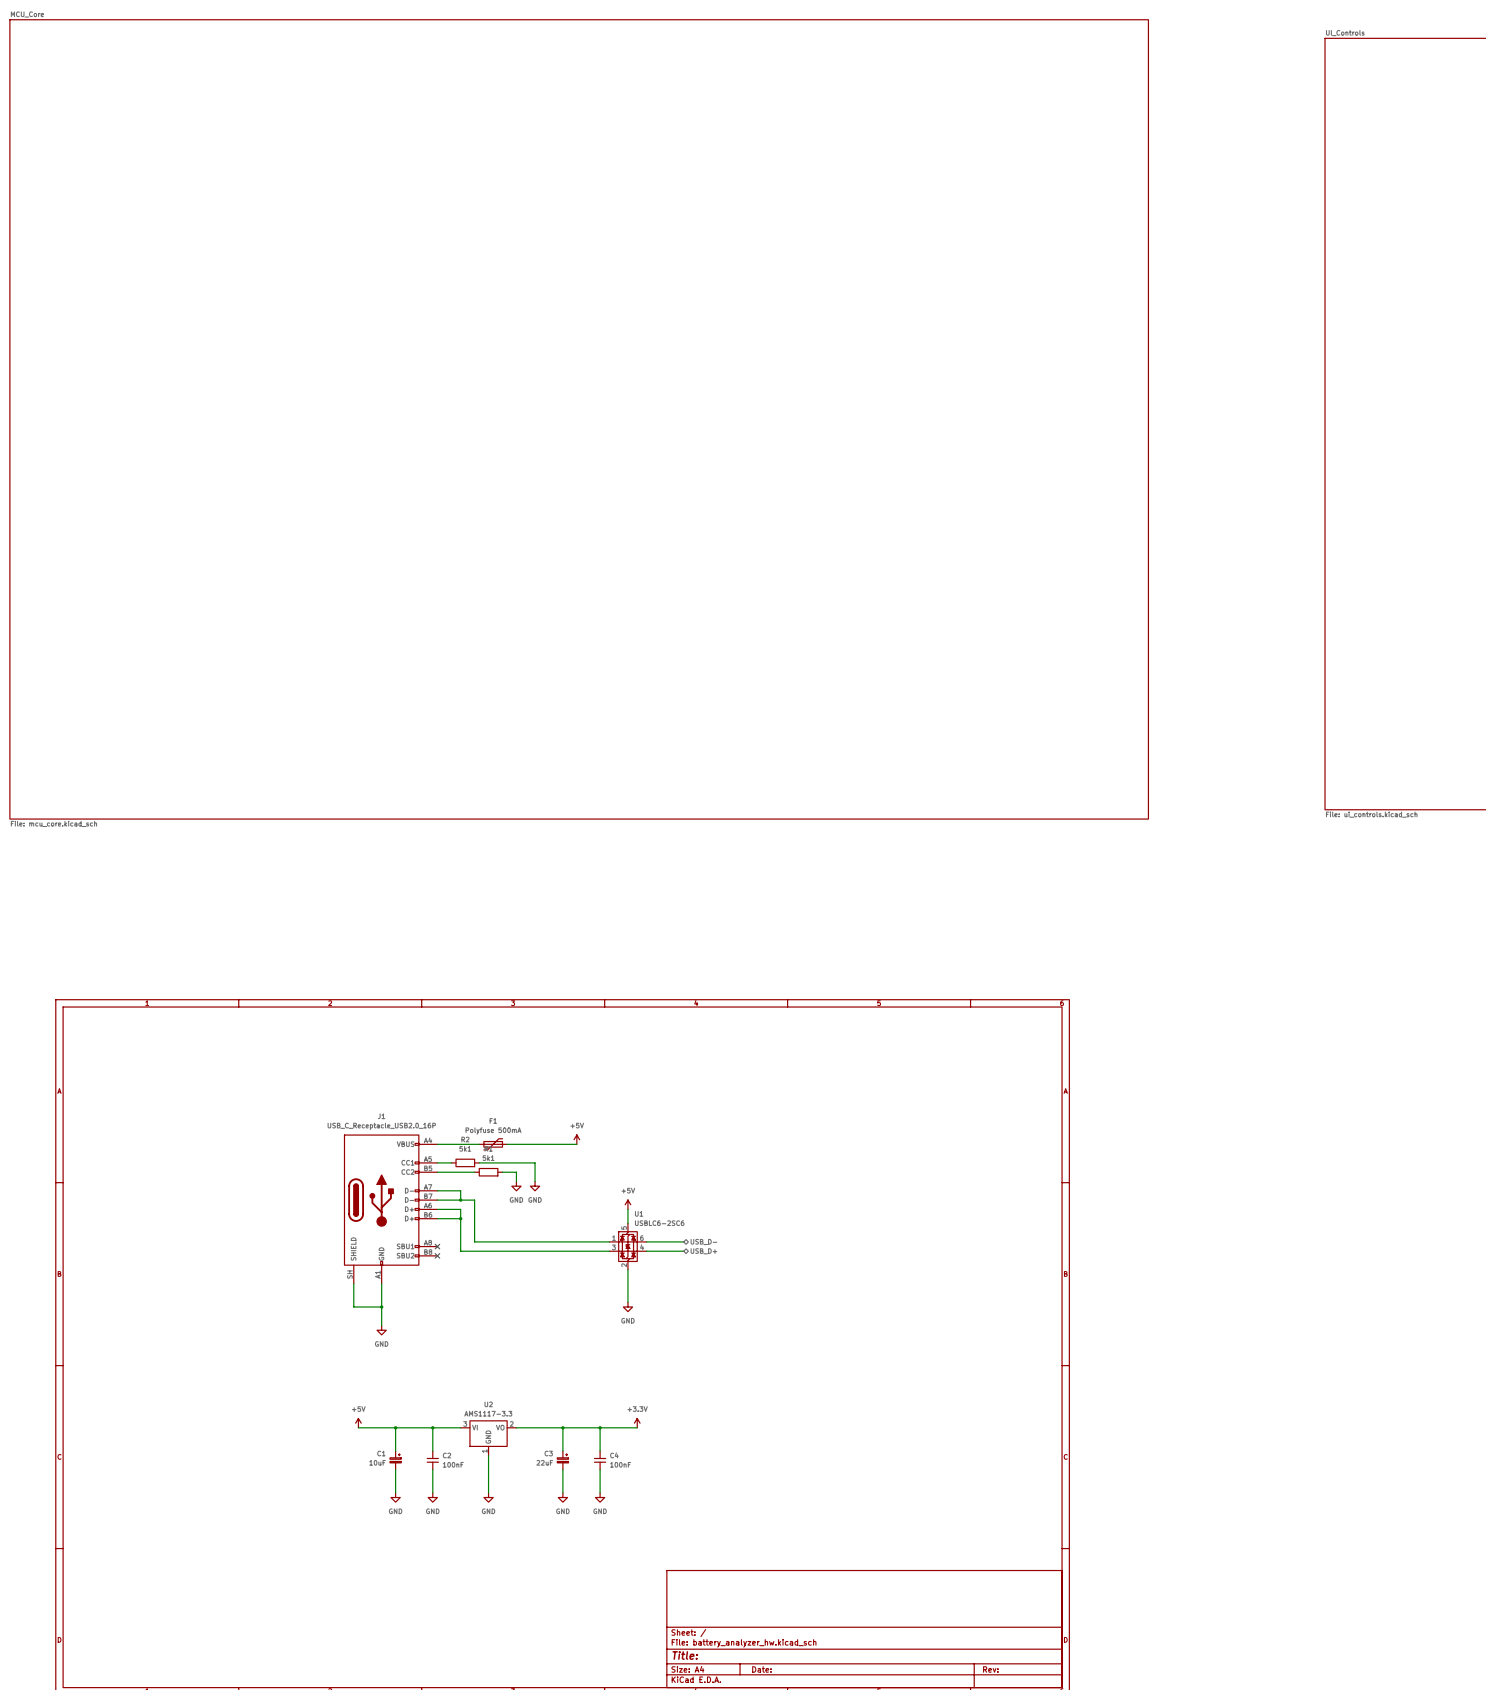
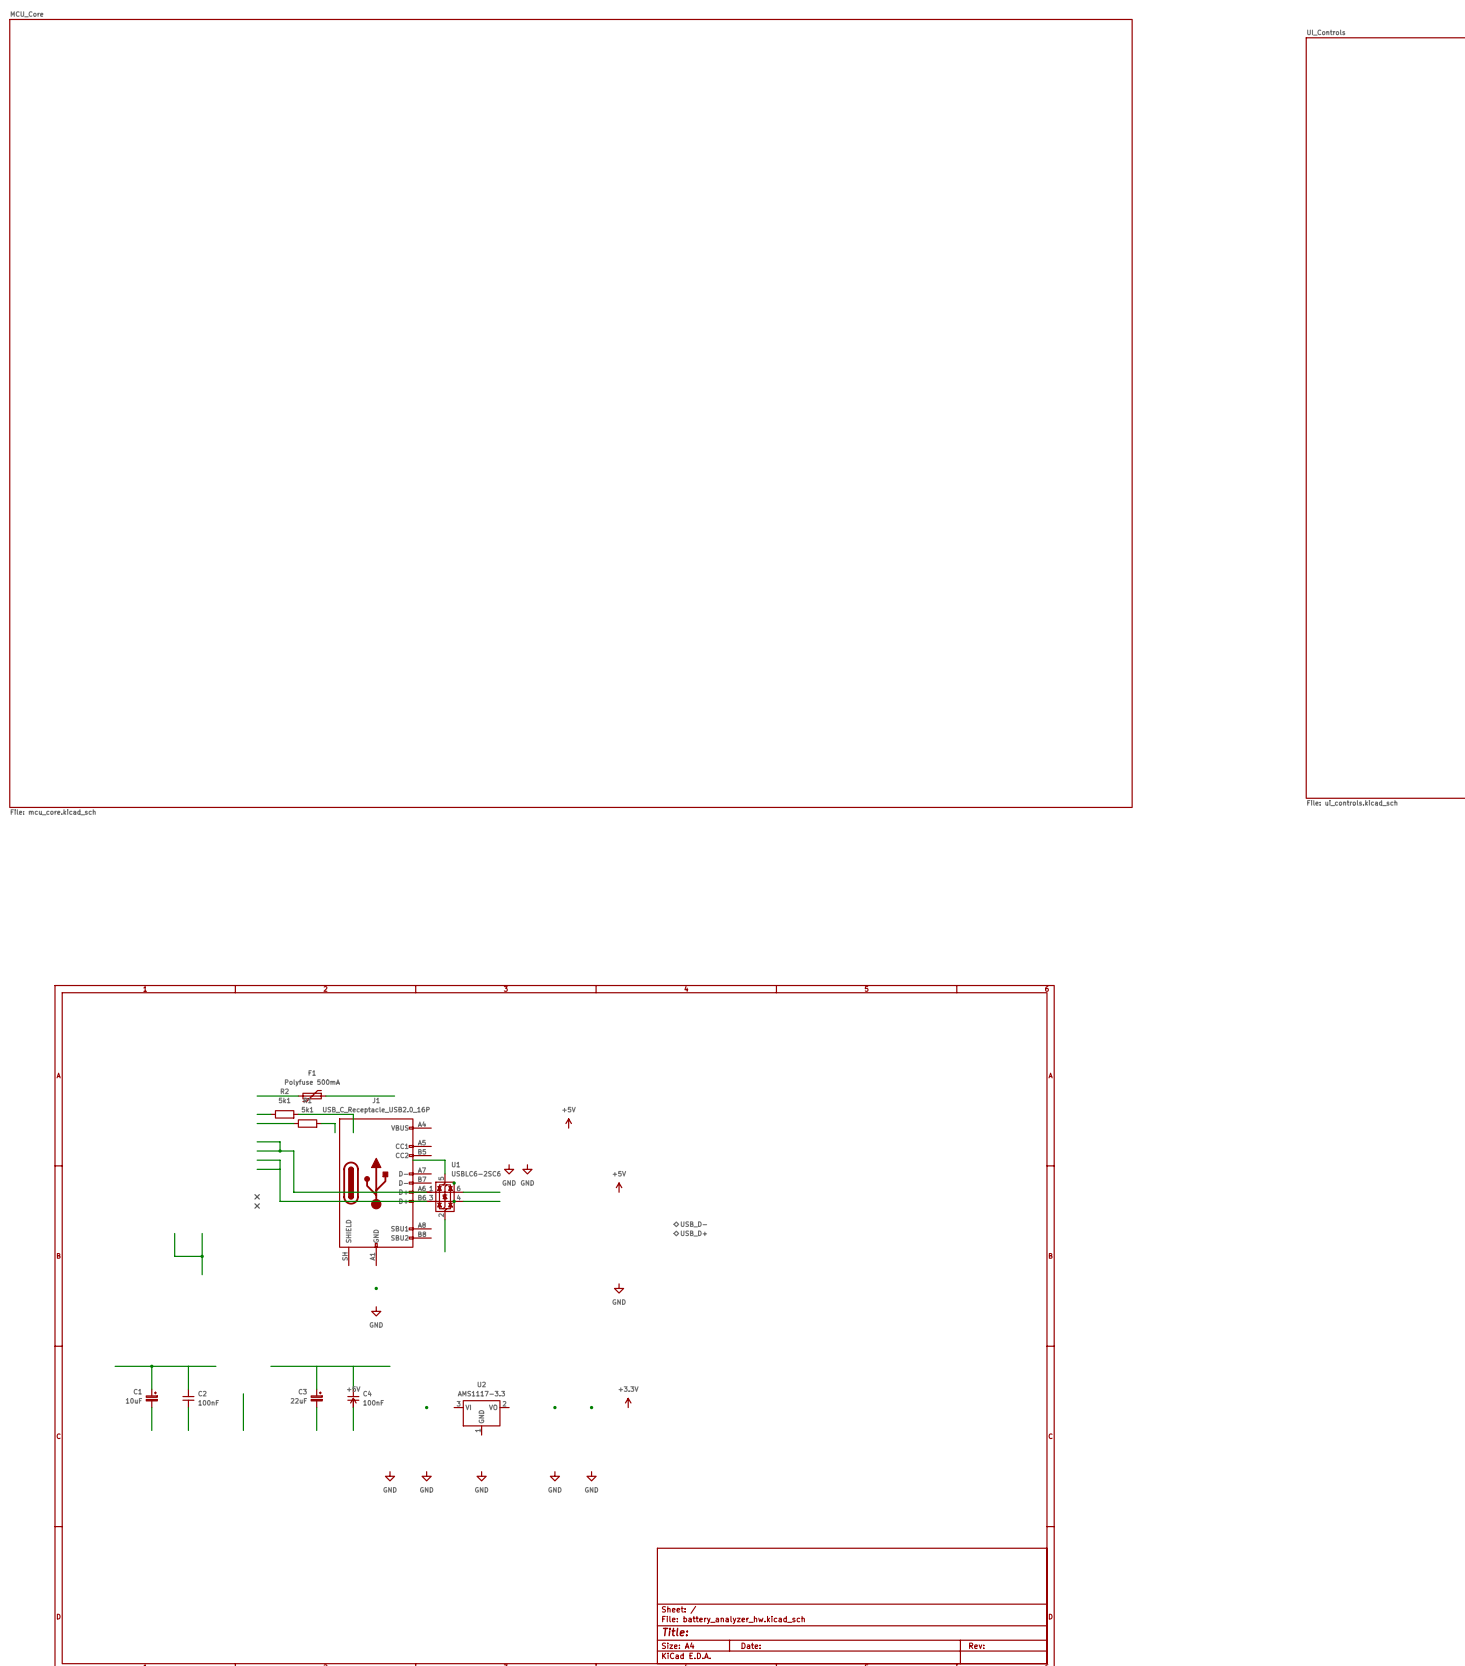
wire: none -> (257, 1096) (298, 1096)
wire: none -> (325, 1096) (394, 1096)
wire: none -> (257, 1114) (270, 1114)
wire: none -> (298, 1114) (353, 1114) (353, 1132)
wire: none -> (257, 1123) (293, 1123)
wire: none -> (321, 1123) (335, 1123) (335, 1132)
wire: (437, 1144) (479, 1144) -> none
part position: (493, 1144) -> (312, 1096)
wire: (507, 1144) (576, 1144) -> none
wire: none -> (257, 1141) (280, 1141) (280, 1151)
wire: (437, 1162) (451, 1162) -> none
part position: (465, 1162) -> (284, 1114)
wire: (479, 1162) (535, 1162) (535, 1181) -> none
wire: none -> (257, 1151) (293, 1151) (293, 1192) (426, 1192)
junction: none -> (280, 1151)
wire: (437, 1172) (474, 1172) -> (463, 1192) (499, 1192)
part position: (488, 1172) -> (307, 1123)
wire: (502, 1172) (516, 1172) (516, 1181) -> none
wire: none -> (257, 1160) (280, 1160) (280, 1201) (426, 1201)
wire: none -> (412, 1160) (444, 1160) (444, 1173)
wire: none -> (257, 1169) (280, 1169)
wire: (437, 1190) (460, 1190) (460, 1200) -> none
wire: (437, 1200) (474, 1200) (474, 1241) (609, 1241) -> none
wire: (437, 1209) (460, 1209) (460, 1251) (609, 1251) -> none
wire: (627, 1209) (627, 1223) -> none
no-connect mark: none -> (257, 1196)
wire: none -> (463, 1201) (499, 1201)
no-connect mark: none -> (257, 1205)
wire: none -> (444, 1219) (444, 1251)
wire: (646, 1241) (683, 1241) -> none
no-connect mark: (437, 1246) -> none
part position: (627, 1246) -> (444, 1196)
wire: none -> (174, 1233) (174, 1256) (202, 1256)
wire: none -> (202, 1233) (202, 1274)
wire: (646, 1251) (683, 1251) -> none
no-connect mark: (437, 1255) -> none
wire: (627, 1269) (627, 1302) -> none
junction: none -> (202, 1256)
wire: (353, 1283) (353, 1306) (381, 1306) -> none
wire: (381, 1283) (381, 1325) -> none
wire: none -> (115, 1366) (215, 1366)
wire: none -> (151, 1366) (151, 1389)
junction: none -> (151, 1366)
wire: none -> (188, 1366) (188, 1389)
wire: none -> (270, 1366) (389, 1366)
wire: none -> (243, 1393) (243, 1430)
wire: none -> (151, 1407) (151, 1430)
wire: none -> (188, 1407) (188, 1430)
wire: (358, 1427) (460, 1427) -> (353, 1407) (353, 1430)
wire: (395, 1427) (395, 1451) -> (316, 1366) (316, 1389)
junction: (395, 1427) -> none
wire: (432, 1427) (432, 1451) -> (353, 1366) (353, 1389)
wire: (516, 1427) (637, 1427) -> none
wire: (562, 1427) (562, 1451) -> none
wire: (600, 1427) (600, 1451) -> none
wire: (488, 1455) (488, 1492) -> none
part position: (395, 1460) -> (151, 1398)
part position: (432, 1460) -> (188, 1398)
part position: (562, 1460) -> (316, 1398)
part position: (600, 1460) -> (353, 1398)
wire: (395, 1469) (395, 1492) -> (316, 1407) (316, 1430)
wire: (432, 1469) (432, 1492) -> none
wire: (562, 1469) (562, 1492) -> none
wire: (600, 1469) (600, 1492) -> none

